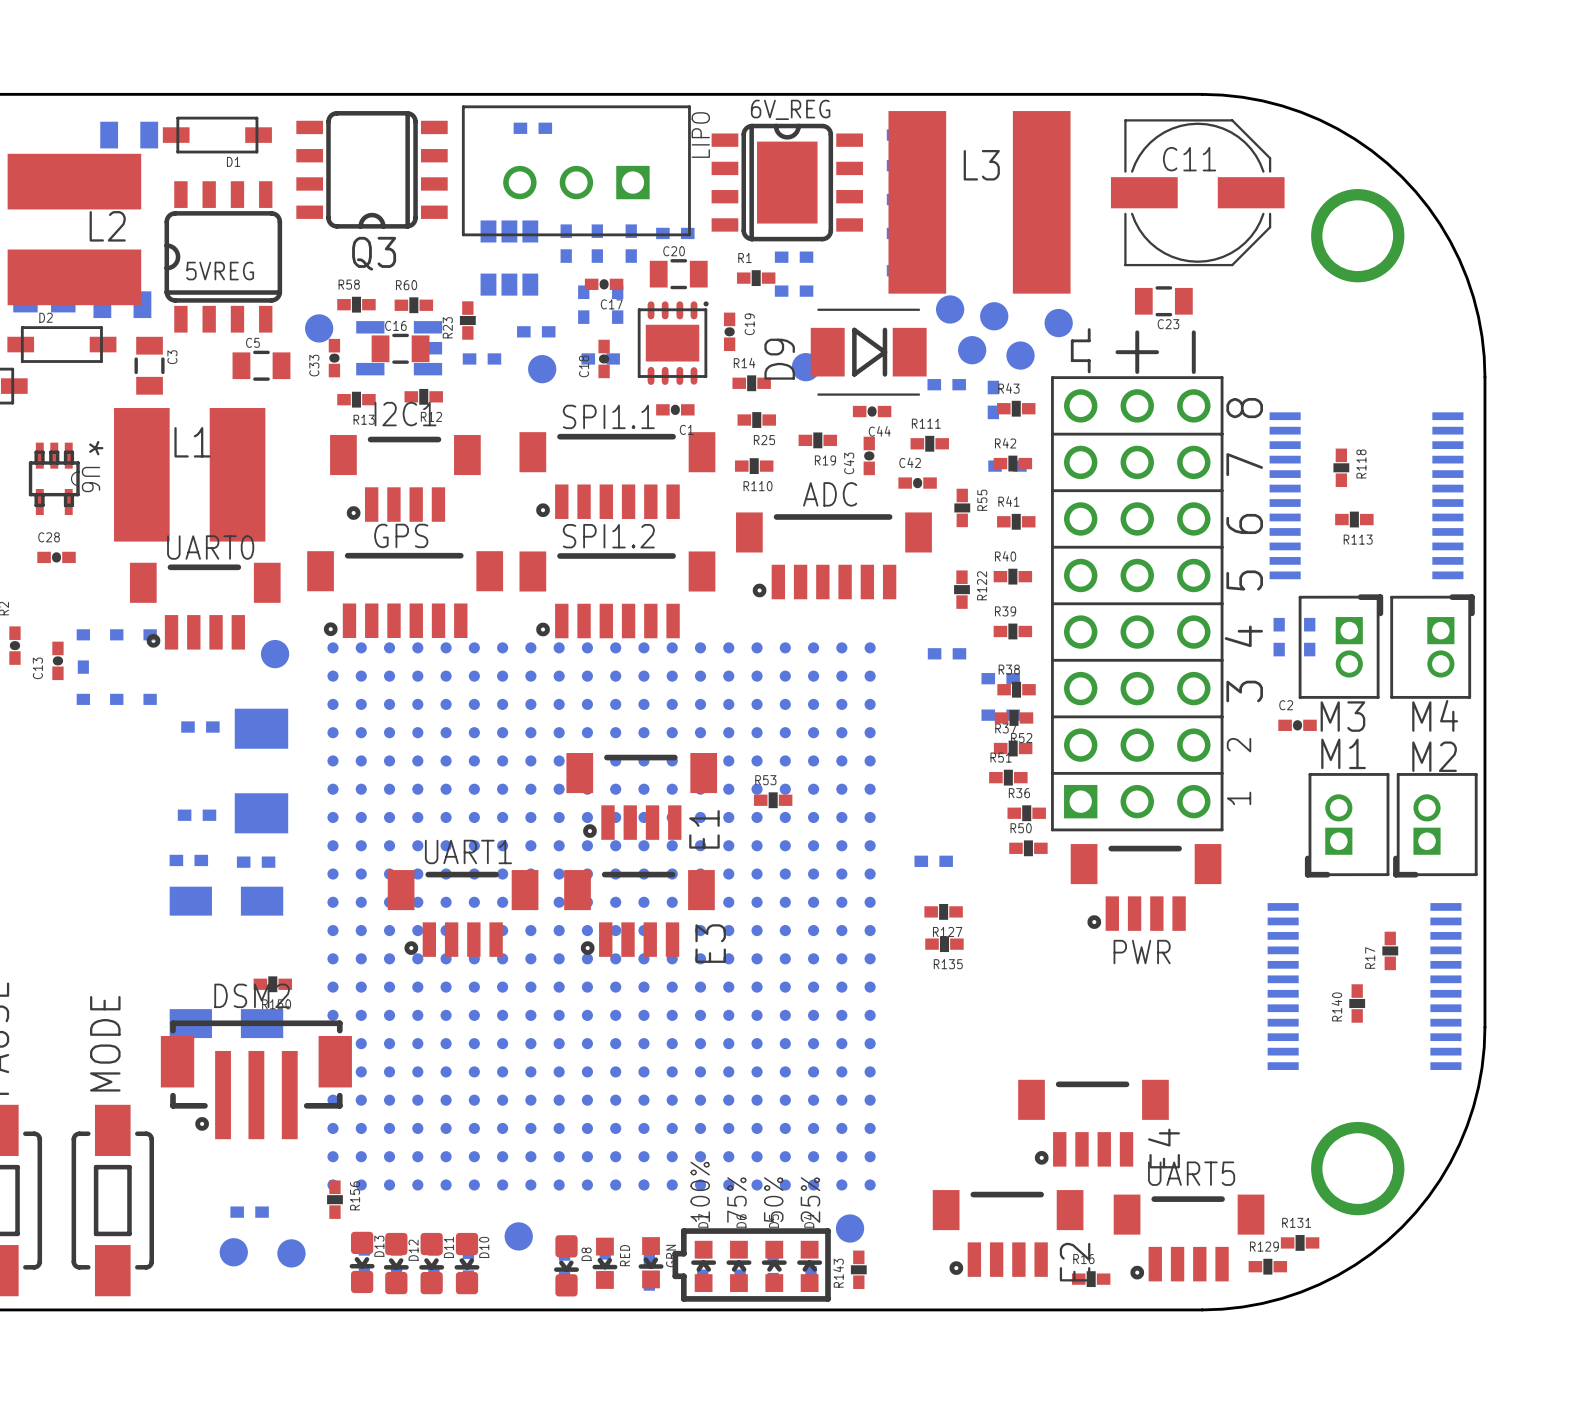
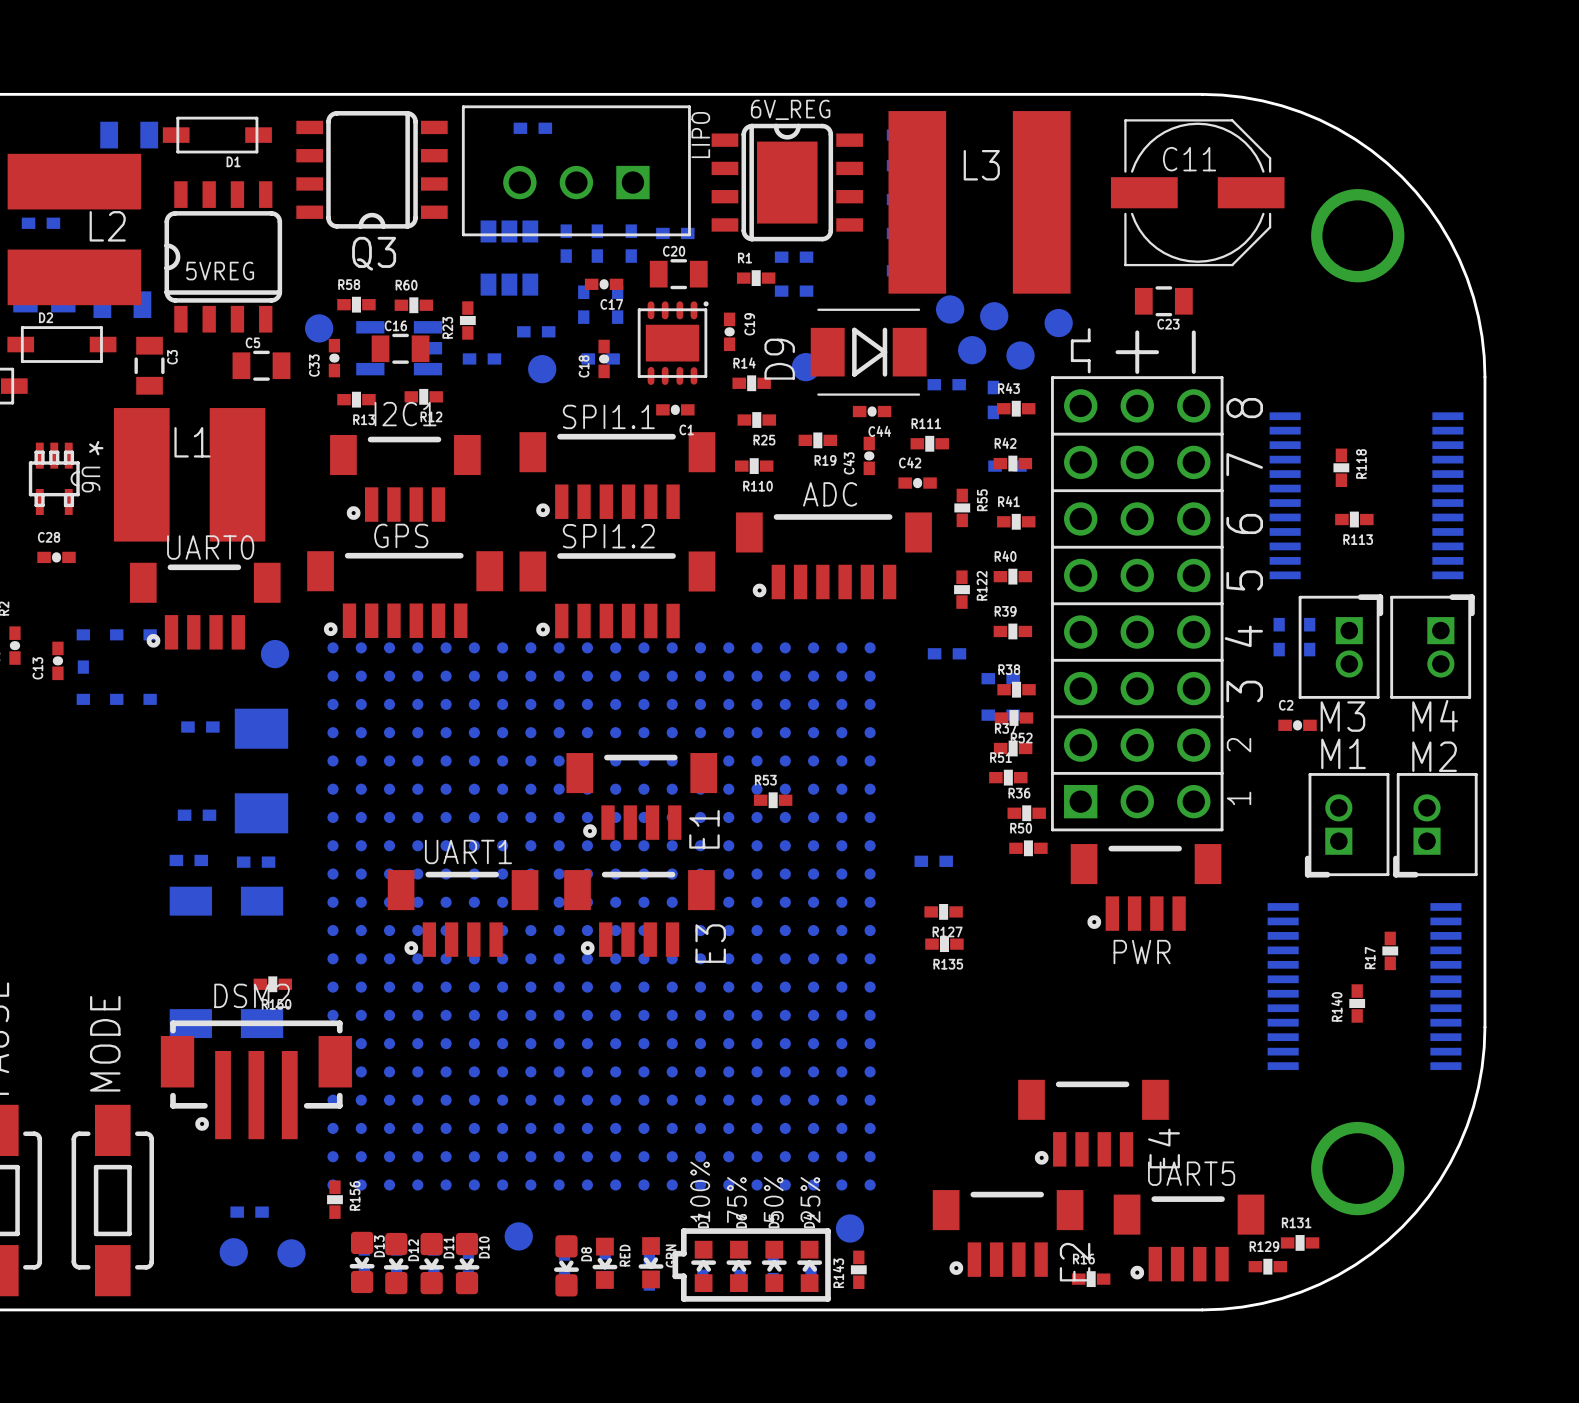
part: none -> (40, 223)

